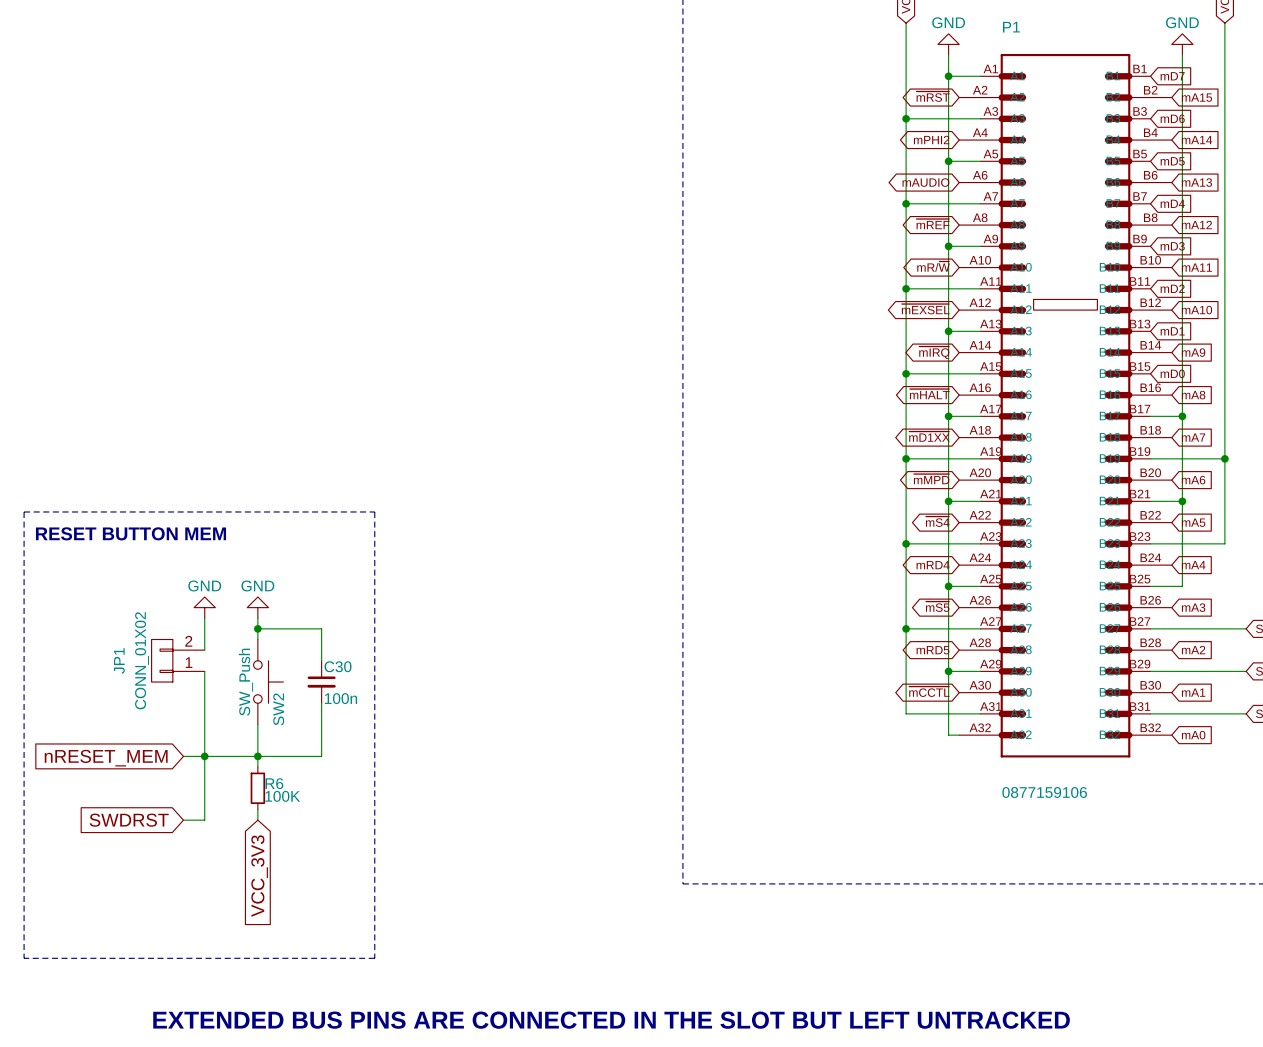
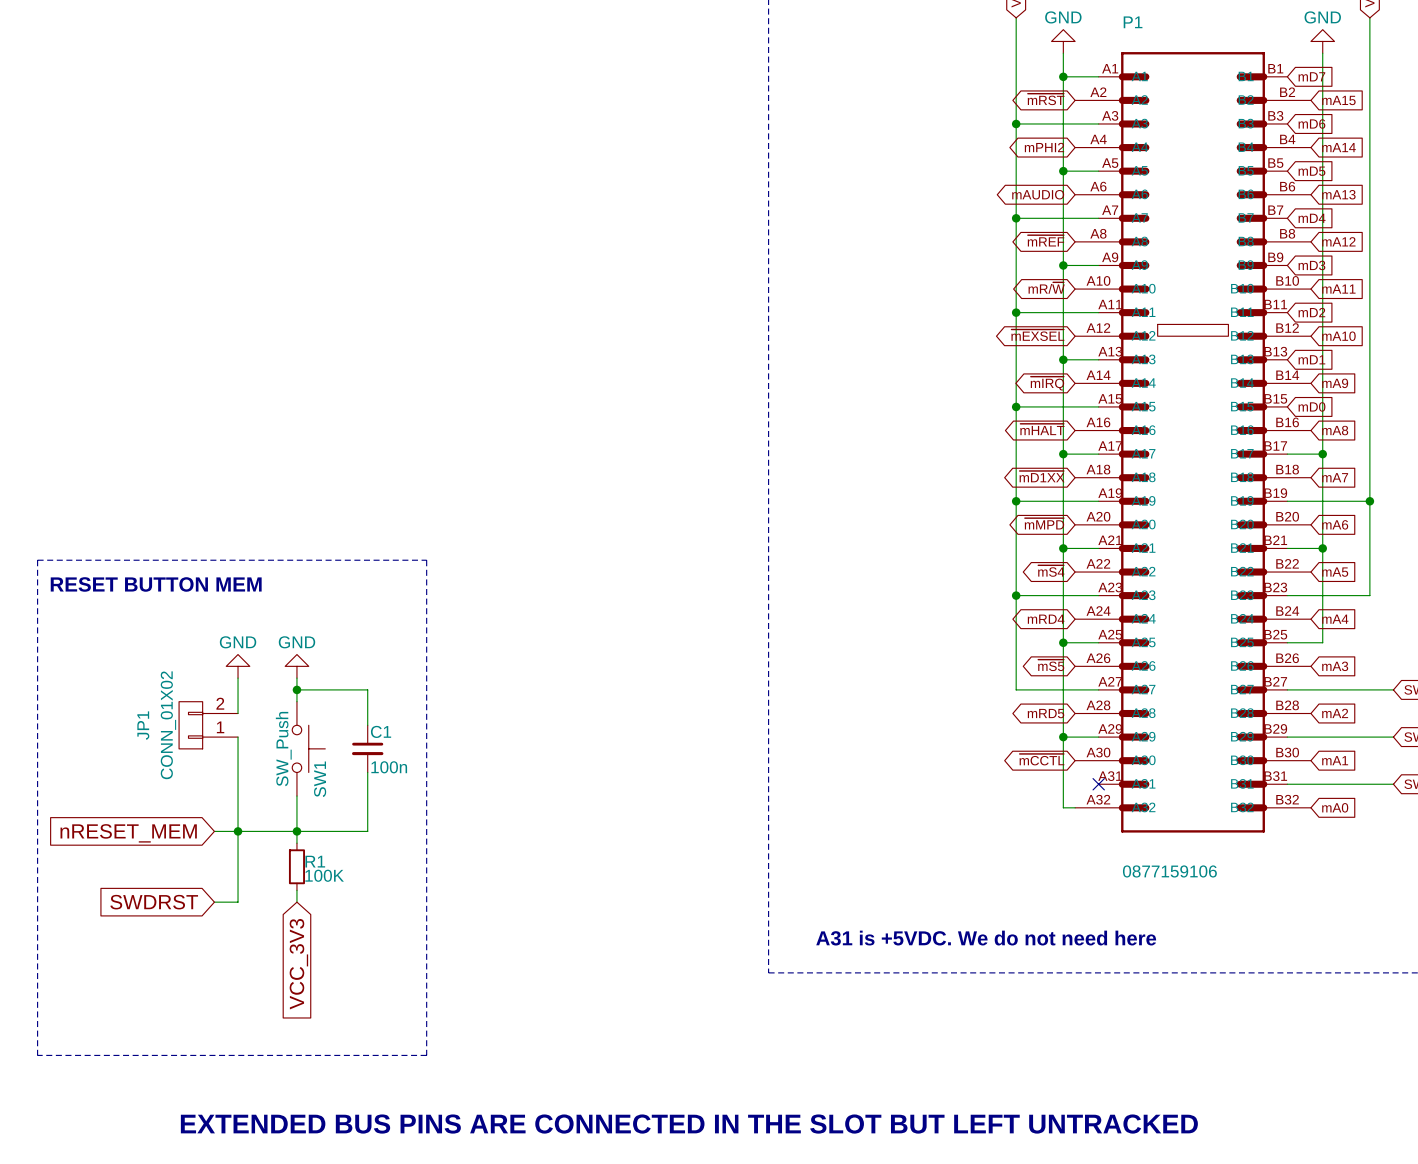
wire: (906, 628) (906, 713) (980, 713) -> none
junction: (906, 628) -> none
C30 name: C30 (338, 666) -> C1 (381, 731)
SW2 name: SW2 (278, 709) -> SW1 (320, 779)
no-connect mark: none -> (1098, 784)
R6 name: R6 (274, 783) -> R1 (315, 861)
text: none -> A31 is +5VDC. We do not need here (986, 938)

